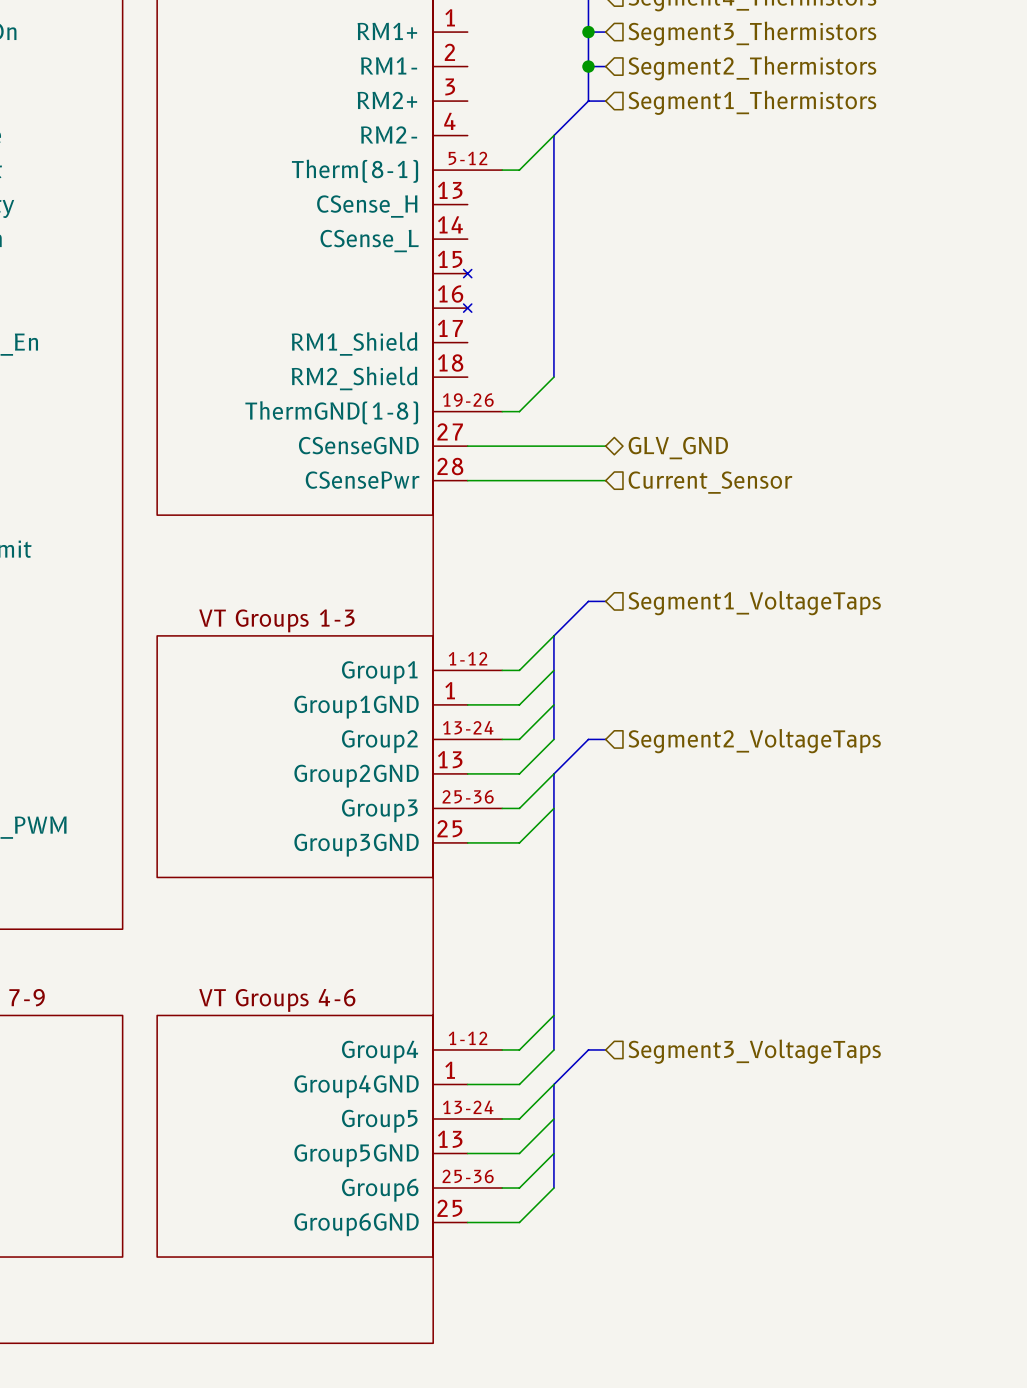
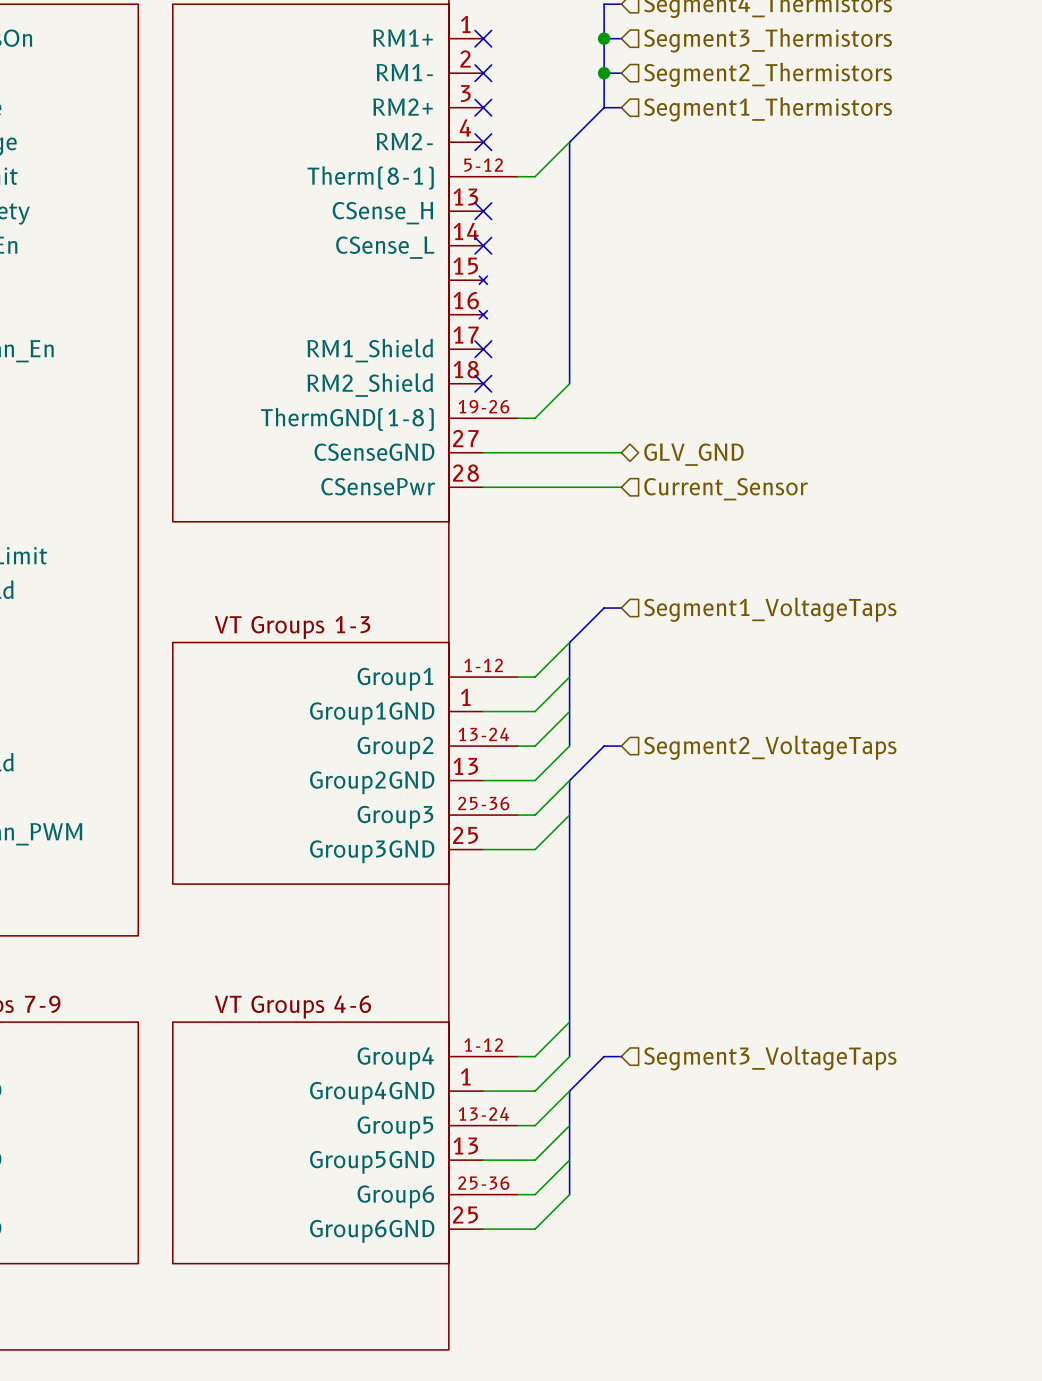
no-connect mark: none -> (483, 38)
no-connect mark: none -> (483, 73)
no-connect mark: none -> (483, 107)
no-connect mark: none -> (483, 142)
no-connect mark: none -> (483, 211)
no-connect mark: none -> (483, 245)
no-connect mark: none -> (483, 349)
no-connect mark: none -> (483, 383)

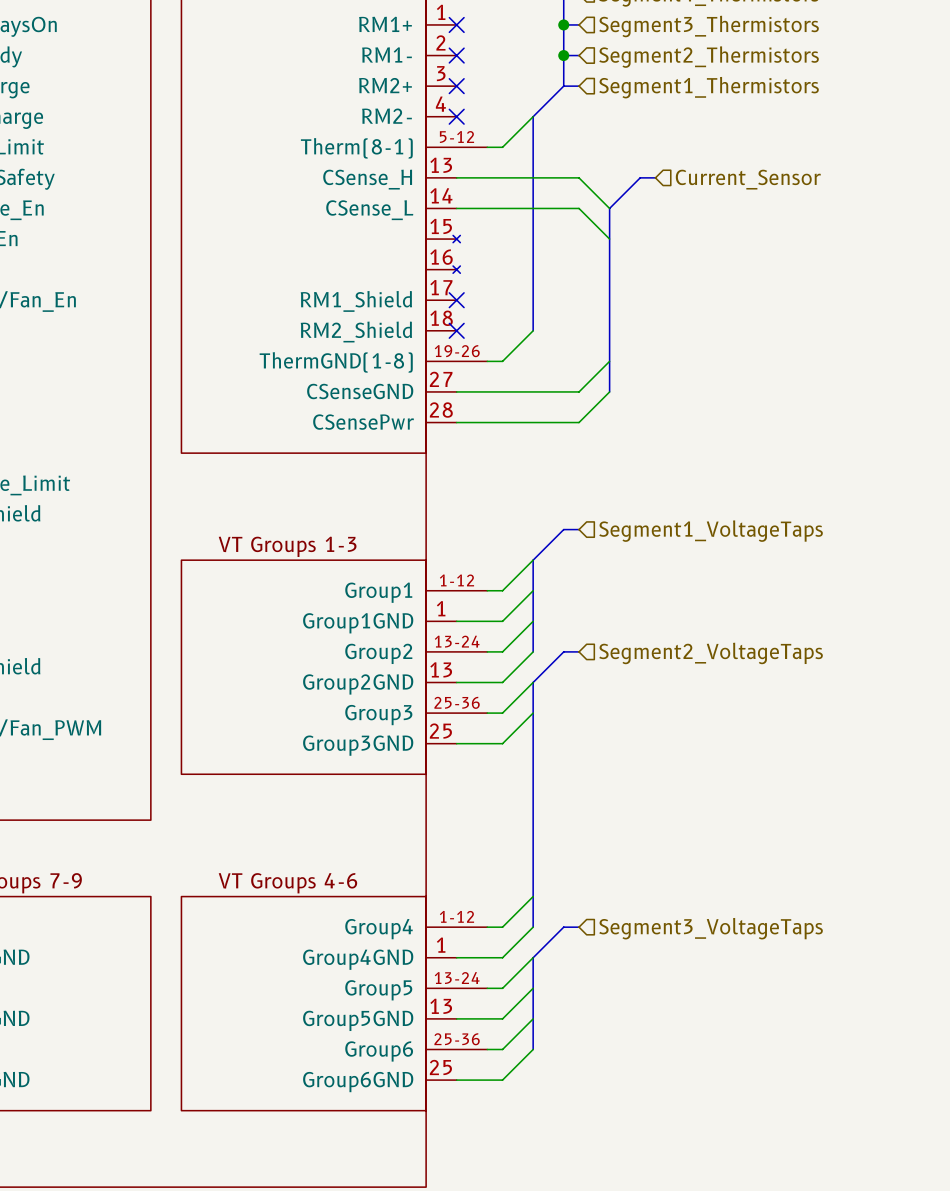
wire: none -> (456, 177) (579, 177) (609, 208)
no-connect mark: (483, 211) -> none
bus: none -> (655, 177) (640, 177) (609, 208) (609, 391)
wire: none -> (456, 208) (579, 208) (609, 239)
no-connect mark: (483, 245) -> none
wire: none -> (609, 361) (579, 391)
wire: none -> (609, 391) (579, 422)
hierarchical label: GLV_GND (693, 454) -> none
hierarchical label position: Current_Sensor (726, 489) -> Current_Sensor (748, 179)

